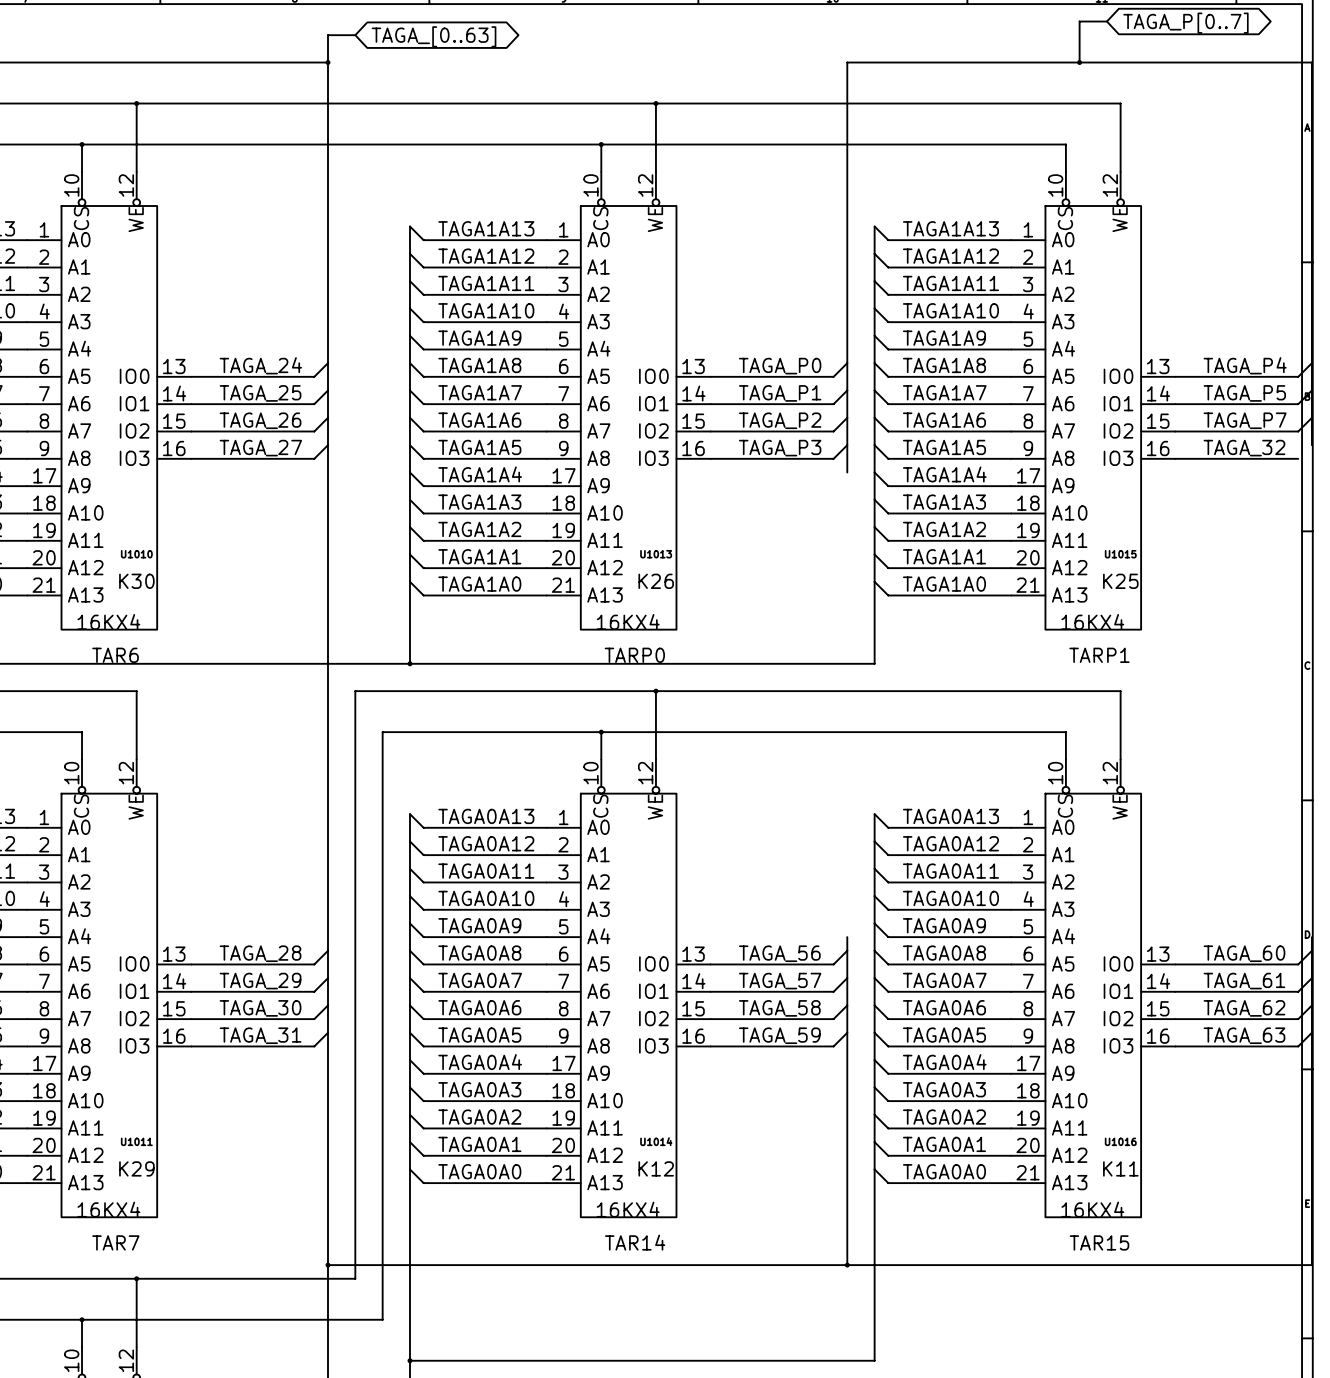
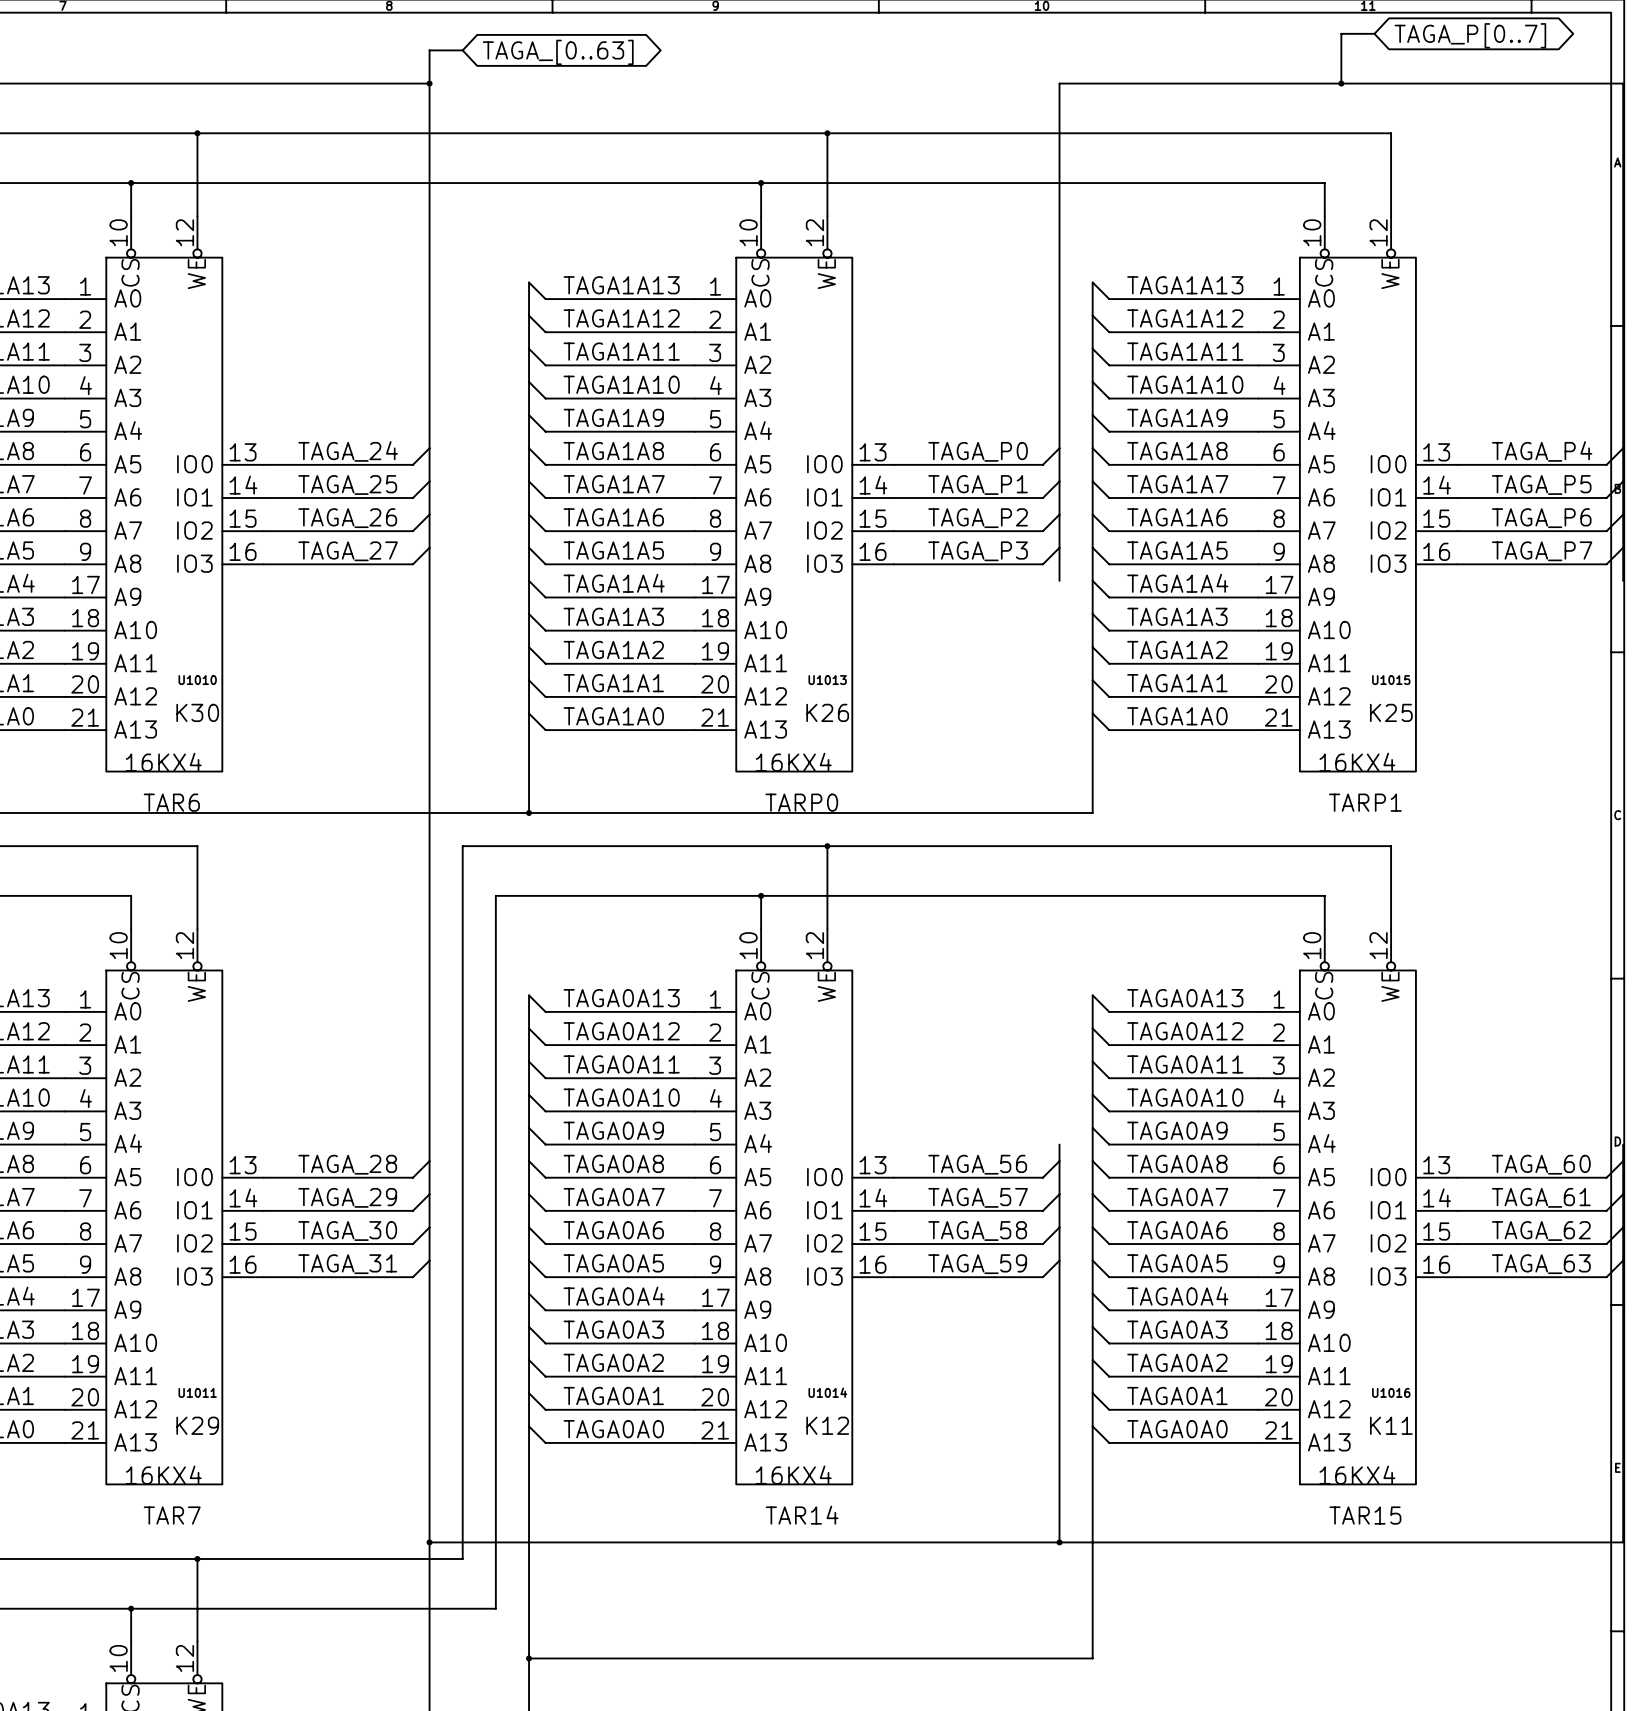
label: TAGA_P7 (1245, 420) -> TAGA_P6 (1541, 518)
bus: none -> (1623, 547) (1623, 580)
wire: none -> (1623, 547) (1606, 564)
label: TAGA_32 (1244, 448) -> TAGA_P7 (1542, 551)

